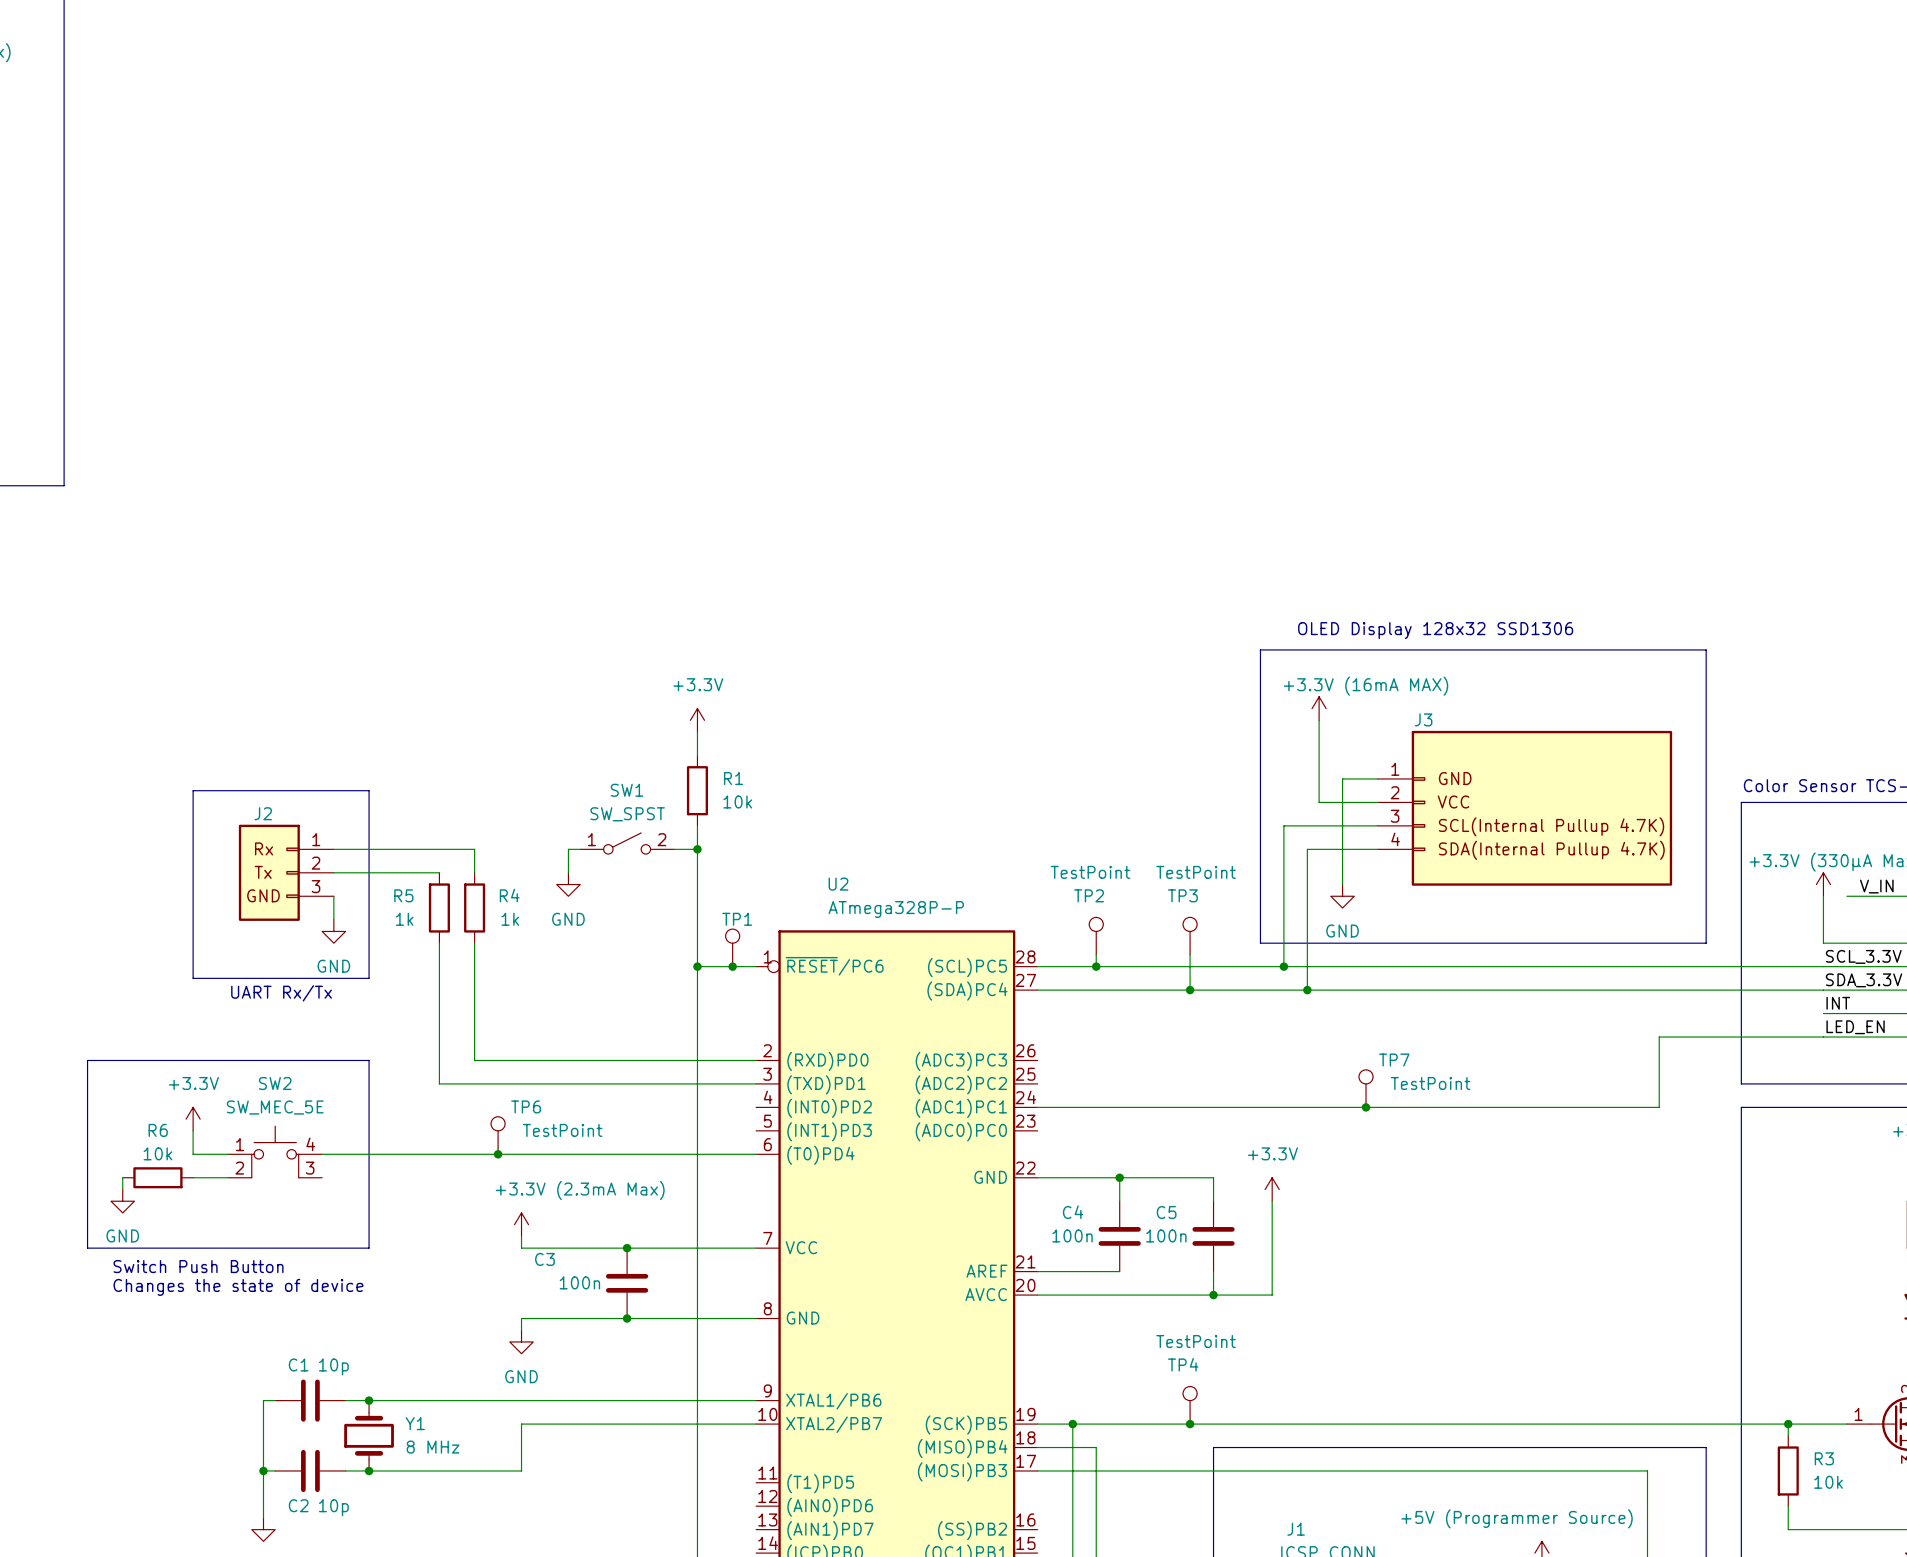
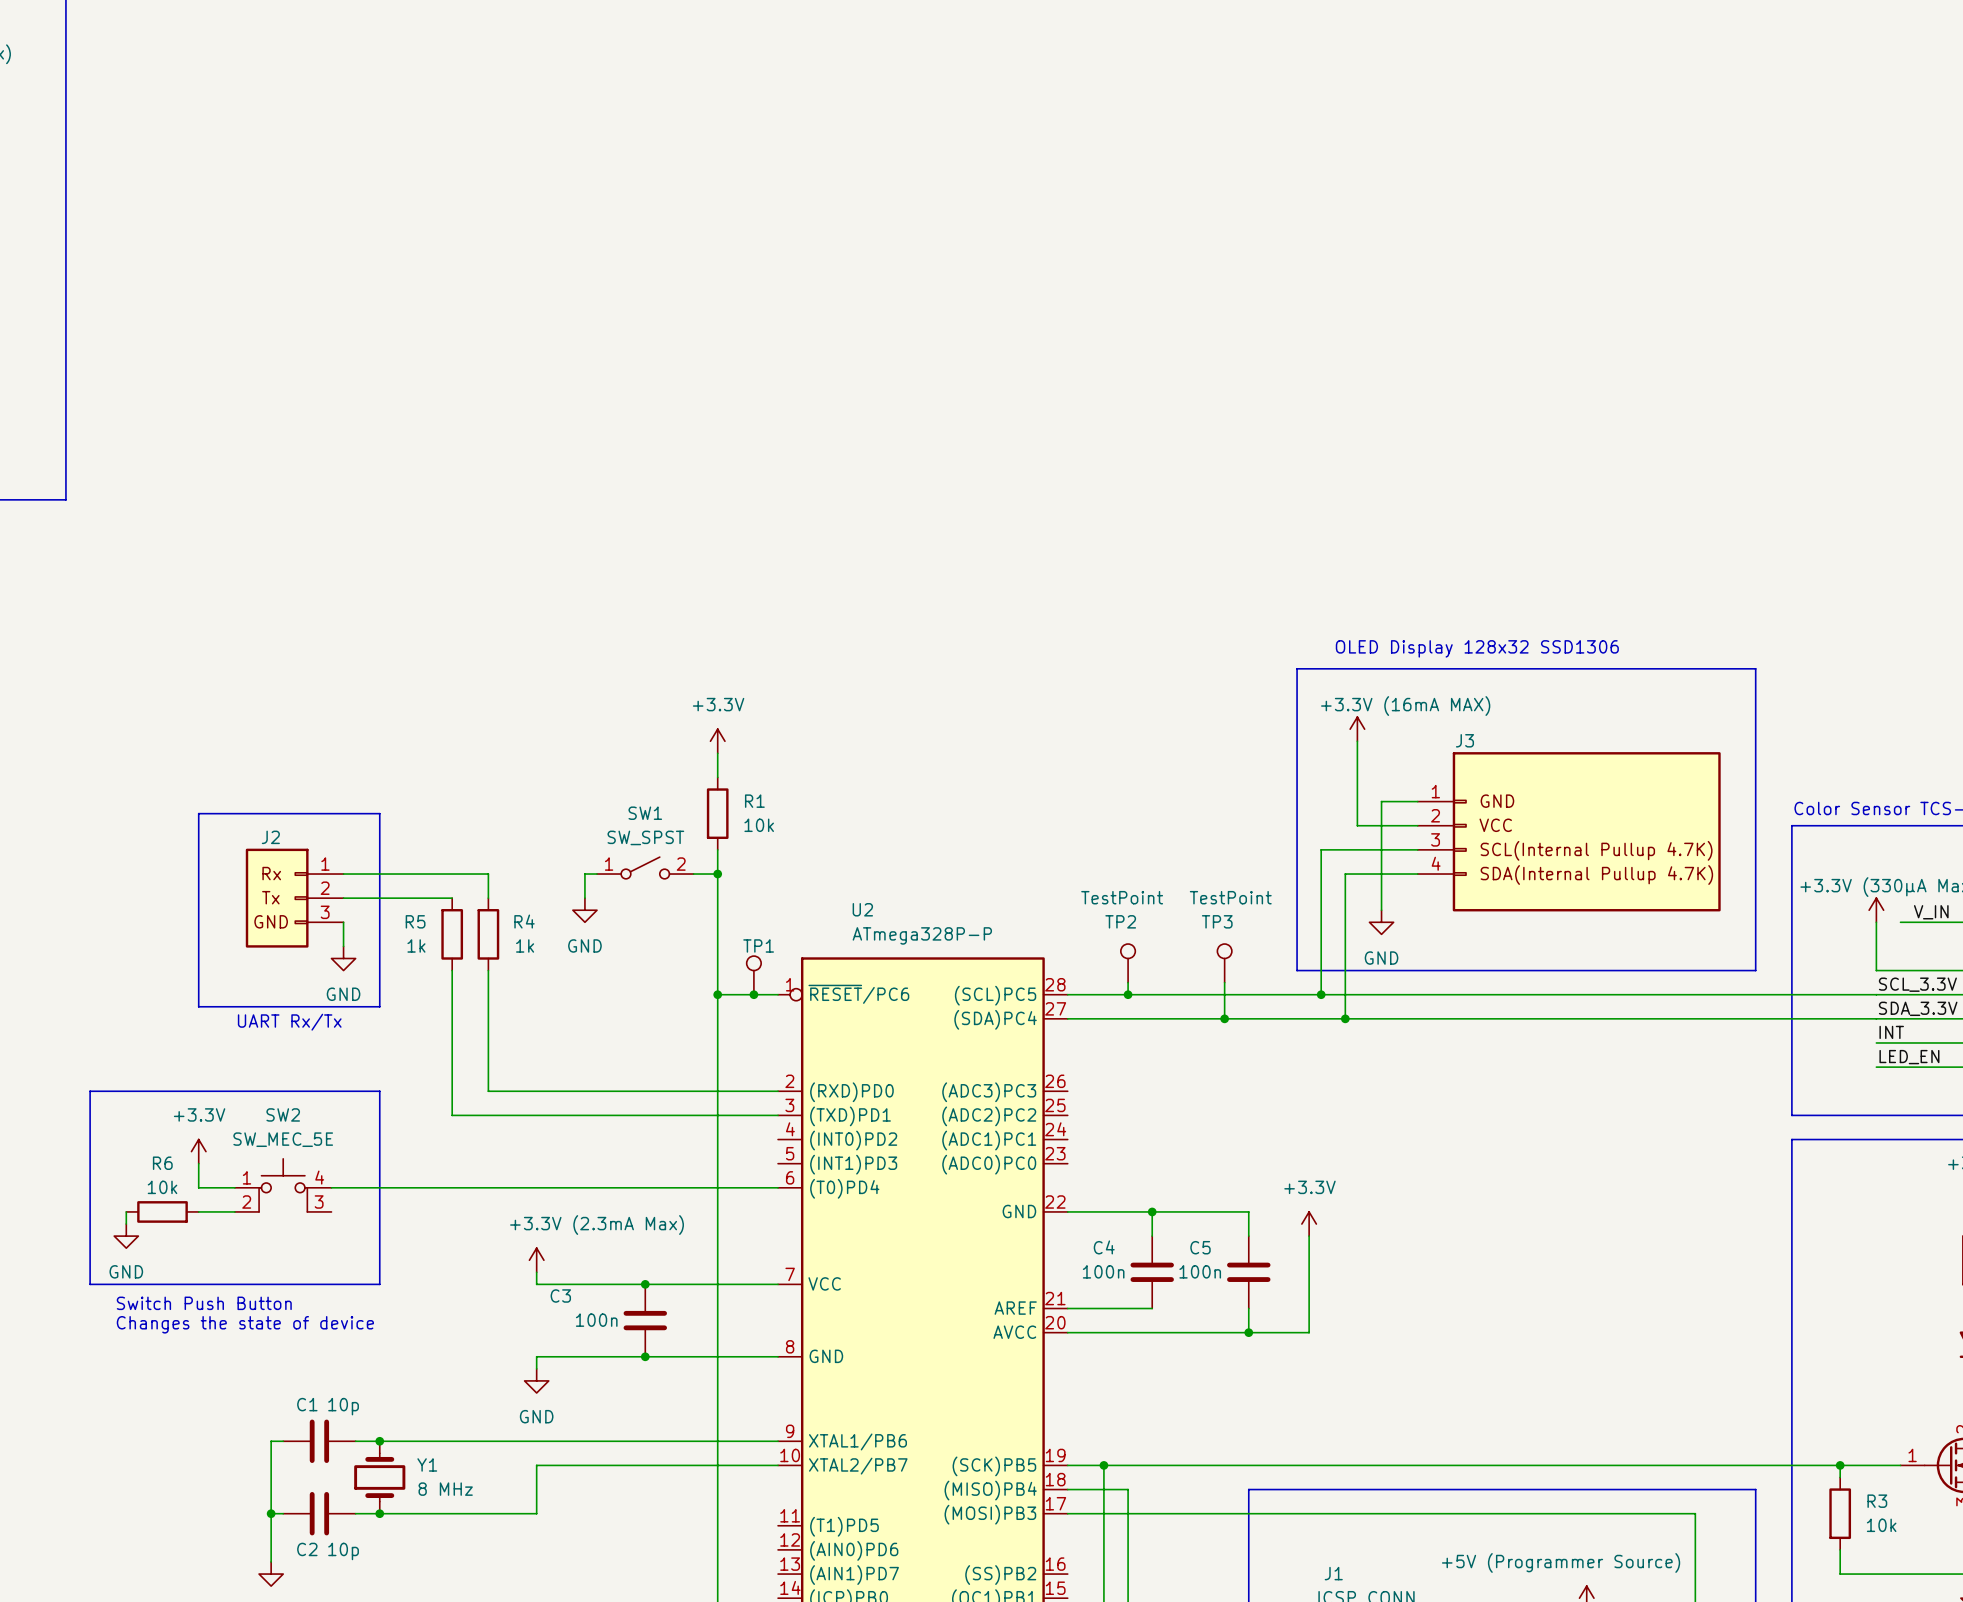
wire: (1823, 1037) (1659, 1037) (1659, 1107) (1037, 1107) -> none
TP7: TestPoint (1366, 1088) -> none
junction: (1366, 1107) -> none
TP6: TestPoint (498, 1135) -> none
junction: (498, 1154) -> none
TP4: TestPoint (1190, 1405) -> none
junction: (1190, 1424) -> none

